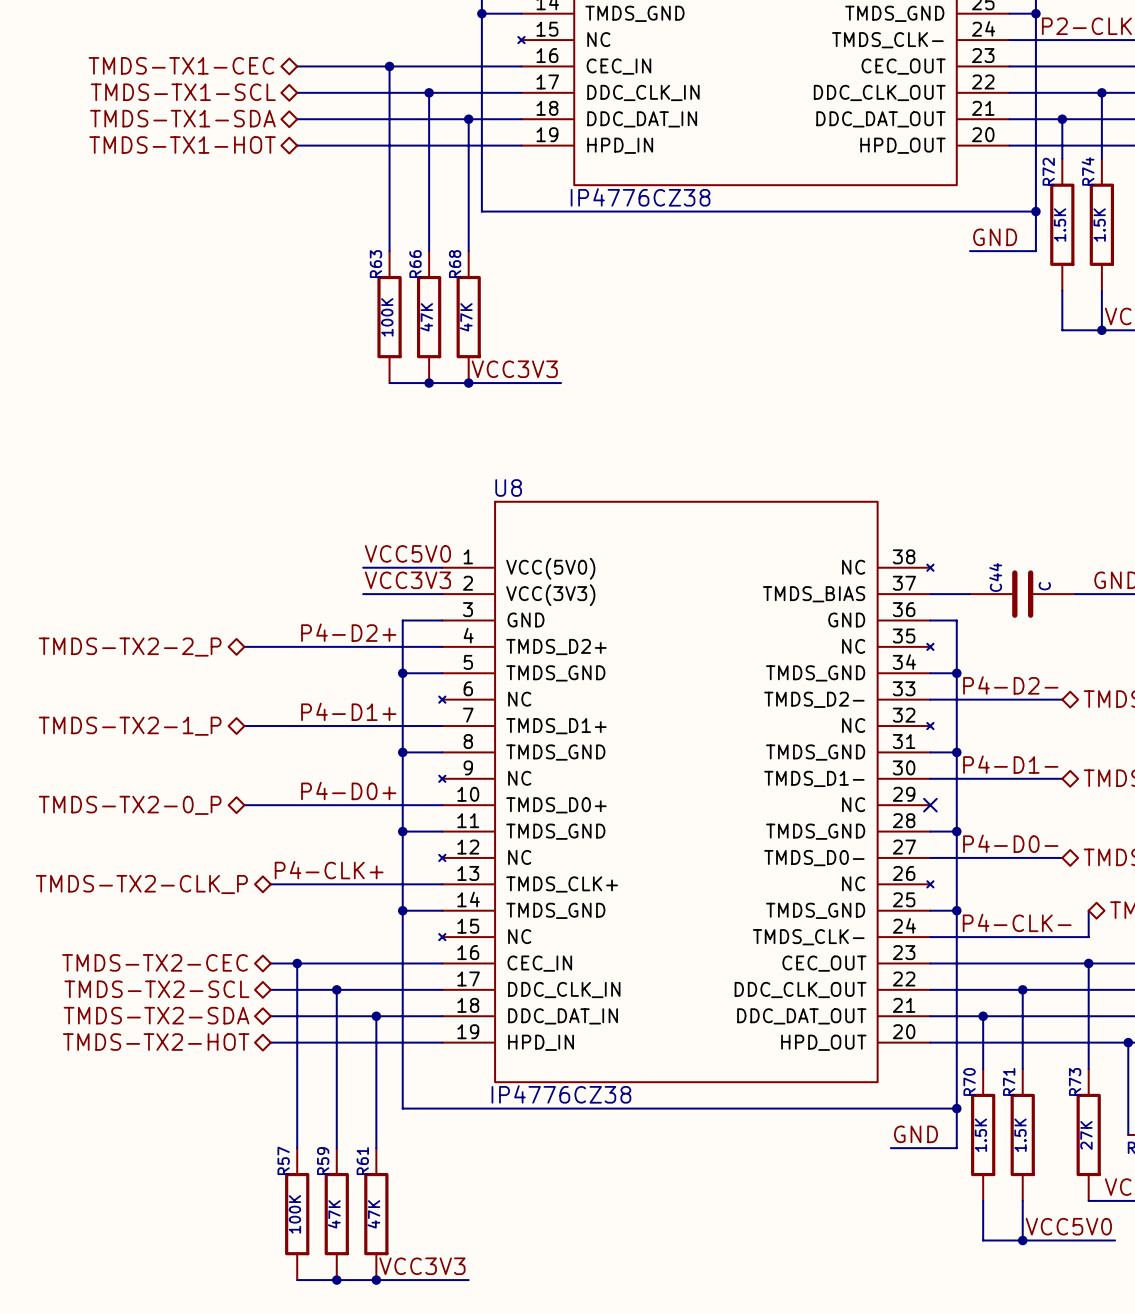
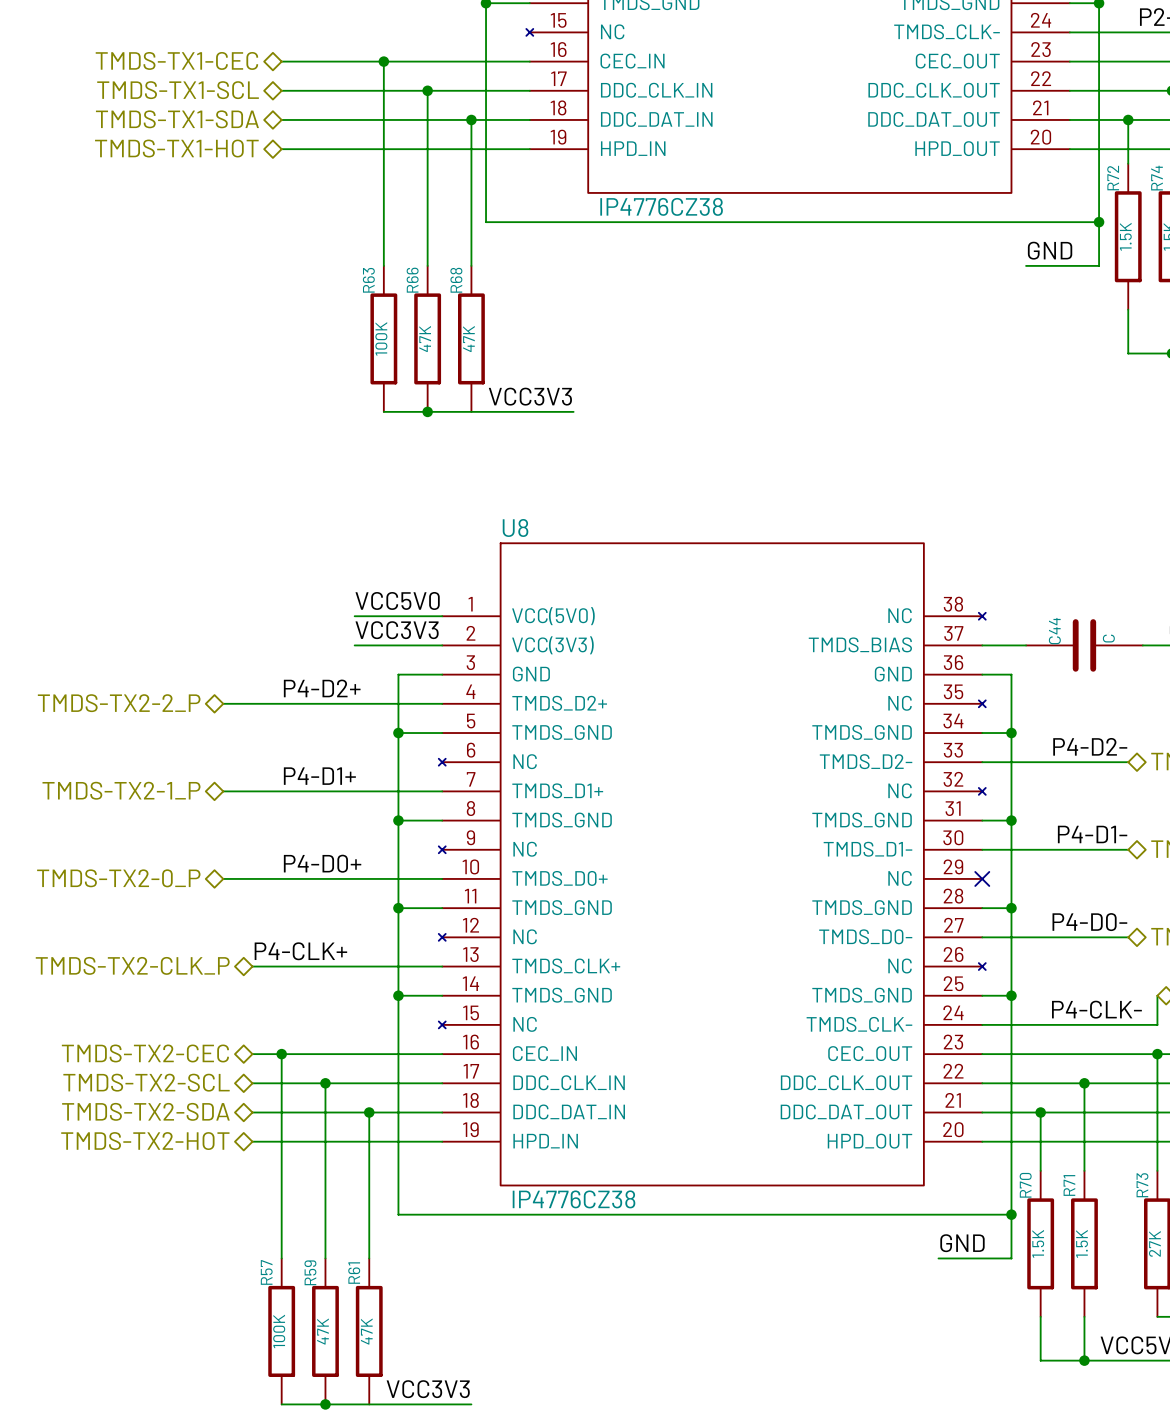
junction: (468, 383) -> none
junction: (376, 1280) -> none

